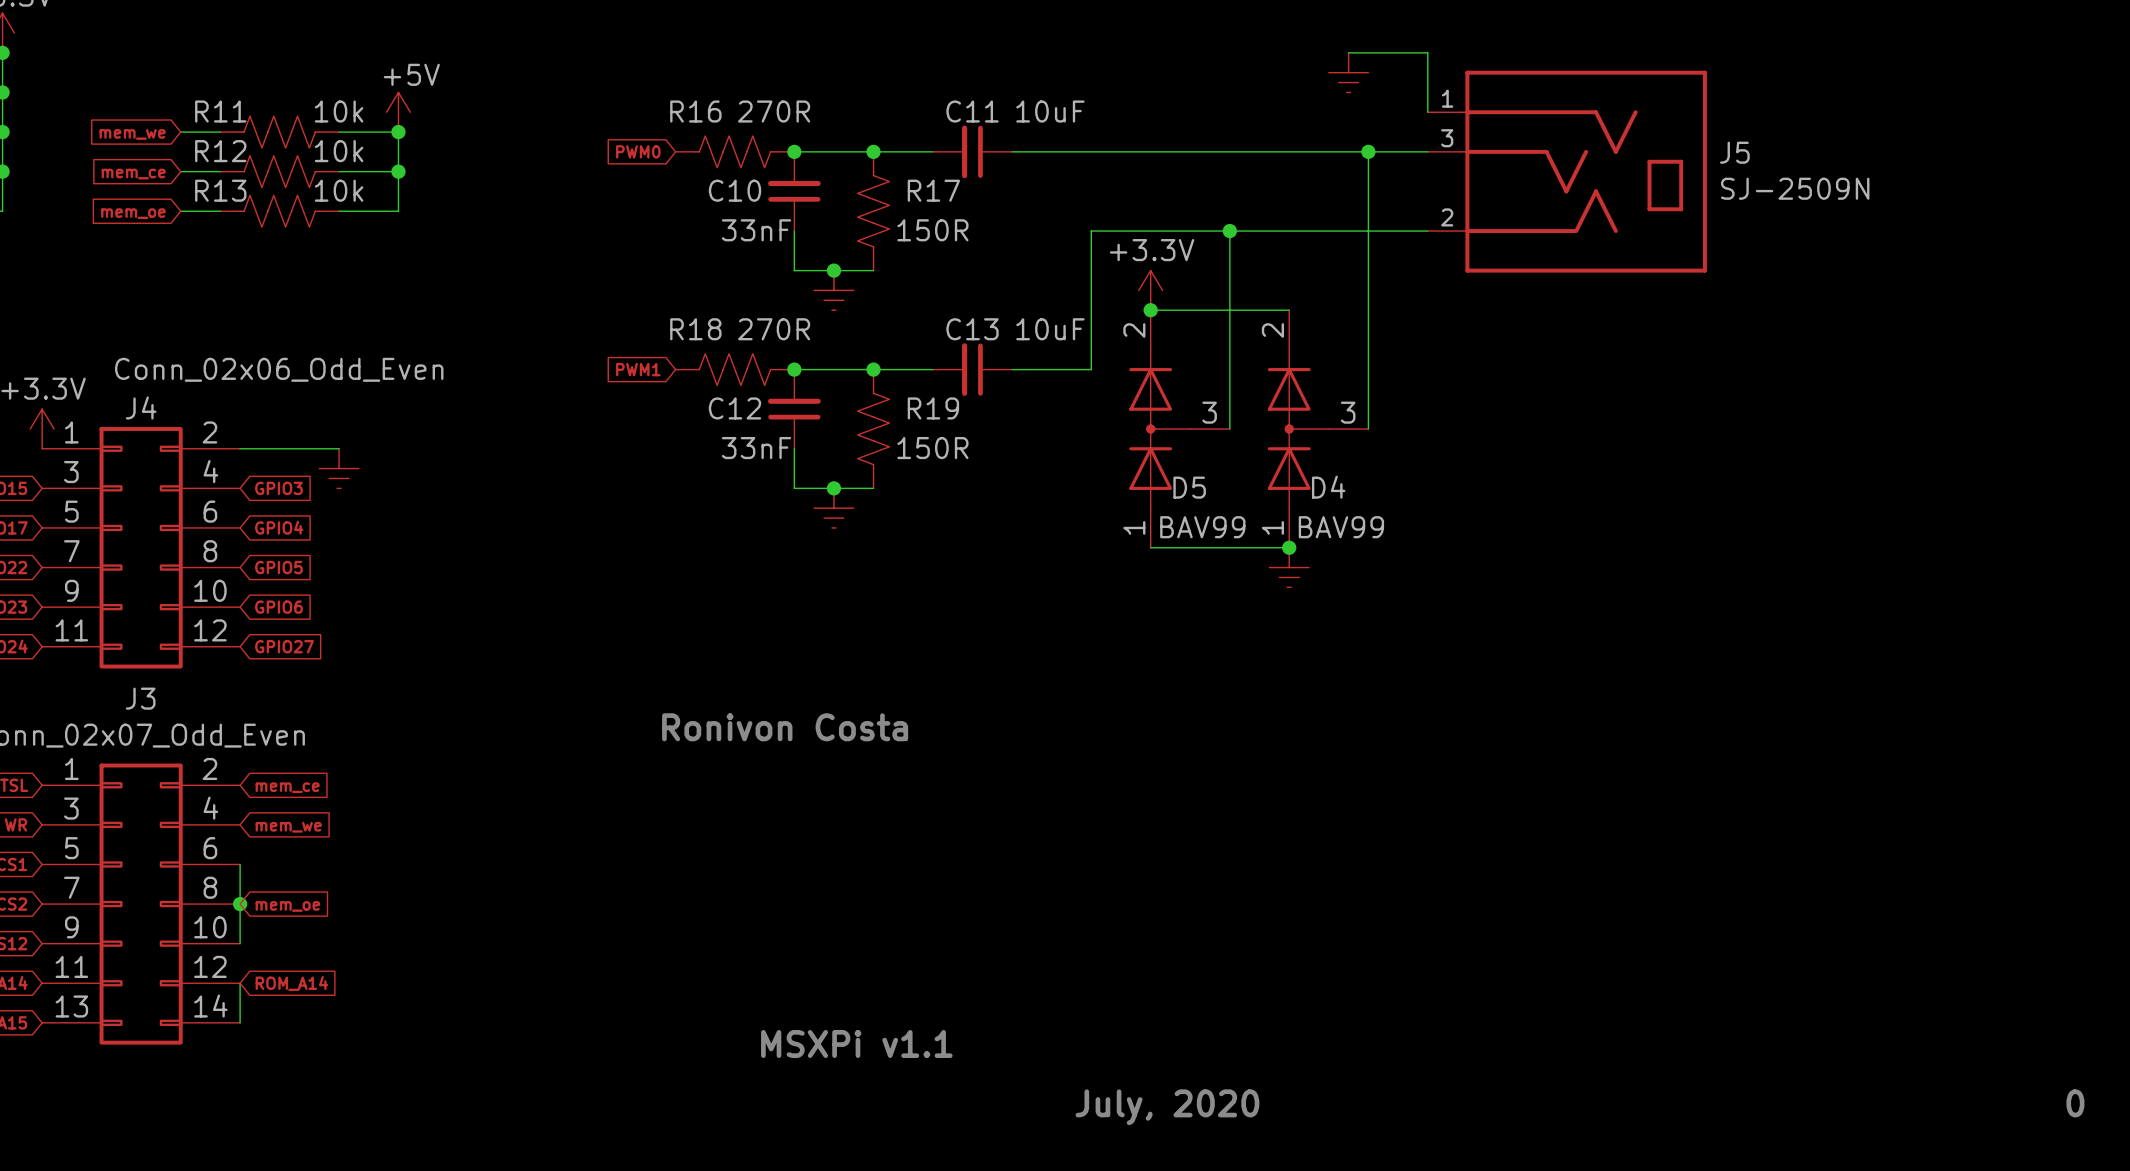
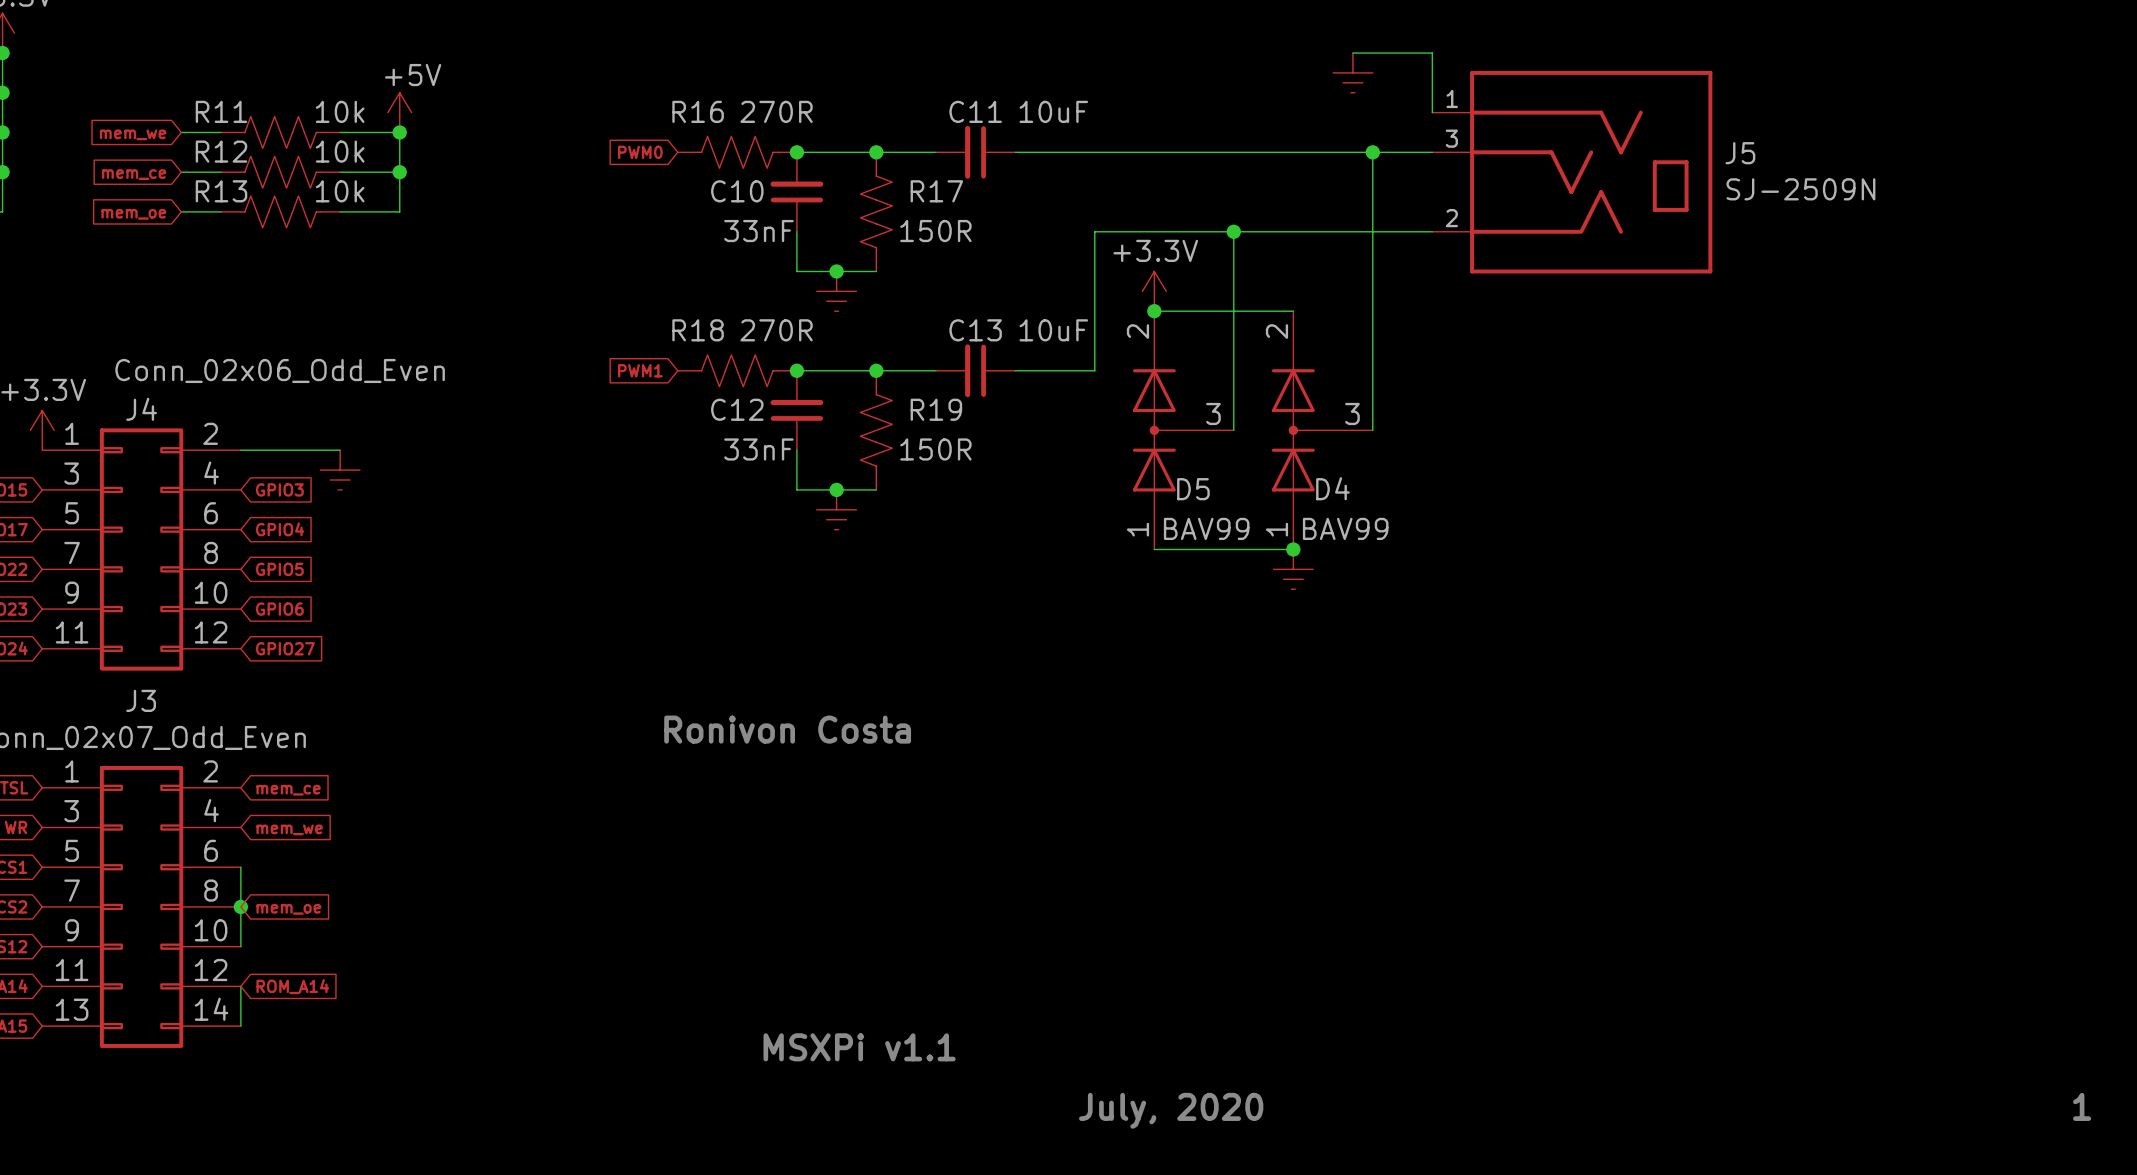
text: 0 (2075, 1103) -> 1 (2082, 1106)

